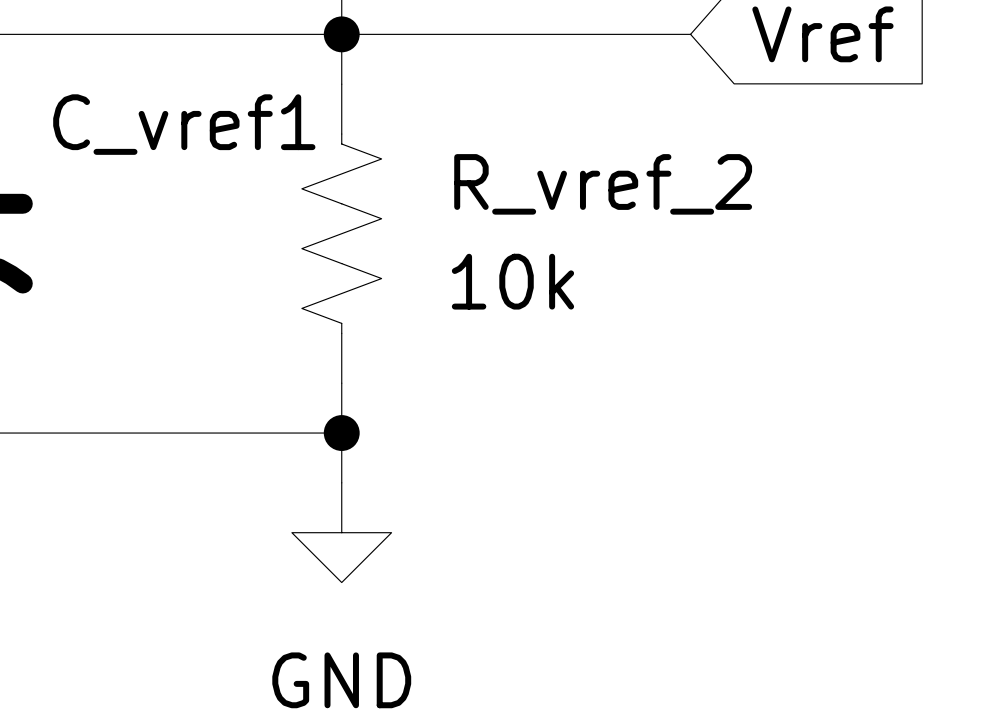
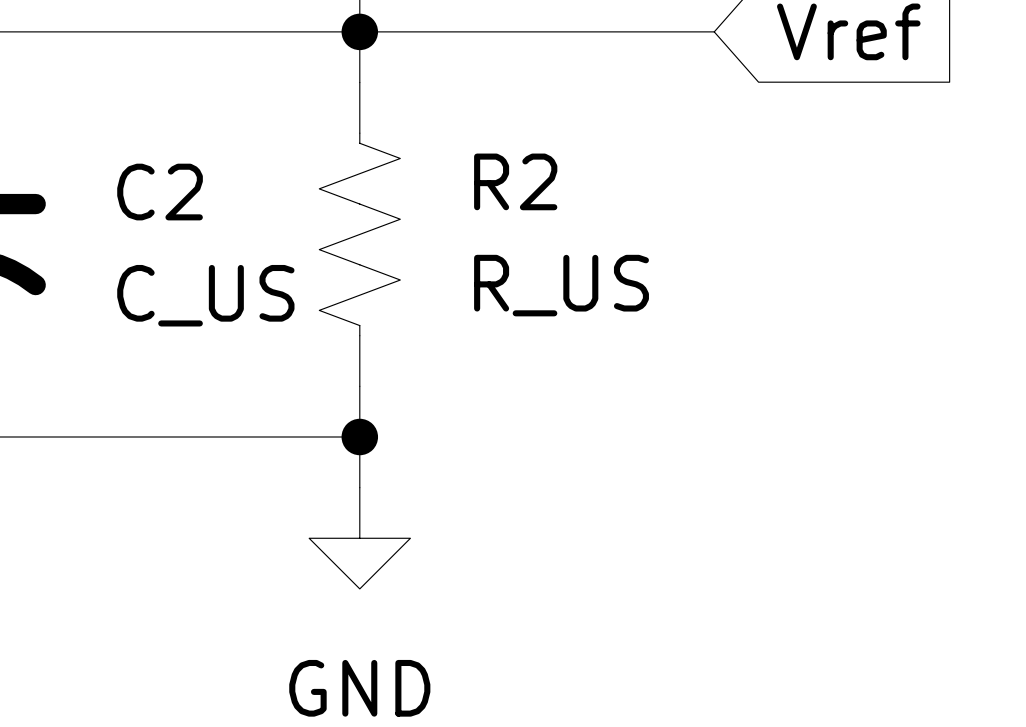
C_vref1 name: C_vref1 (184, 124) -> C2 (160, 192)
R_vref_2 name: R_vref_2 (603, 184) -> R2 (515, 181)
R_vref_2 value: 10k (512, 281) -> R_US (561, 285)
C_vref1 value: none -> C_US (205, 295)

